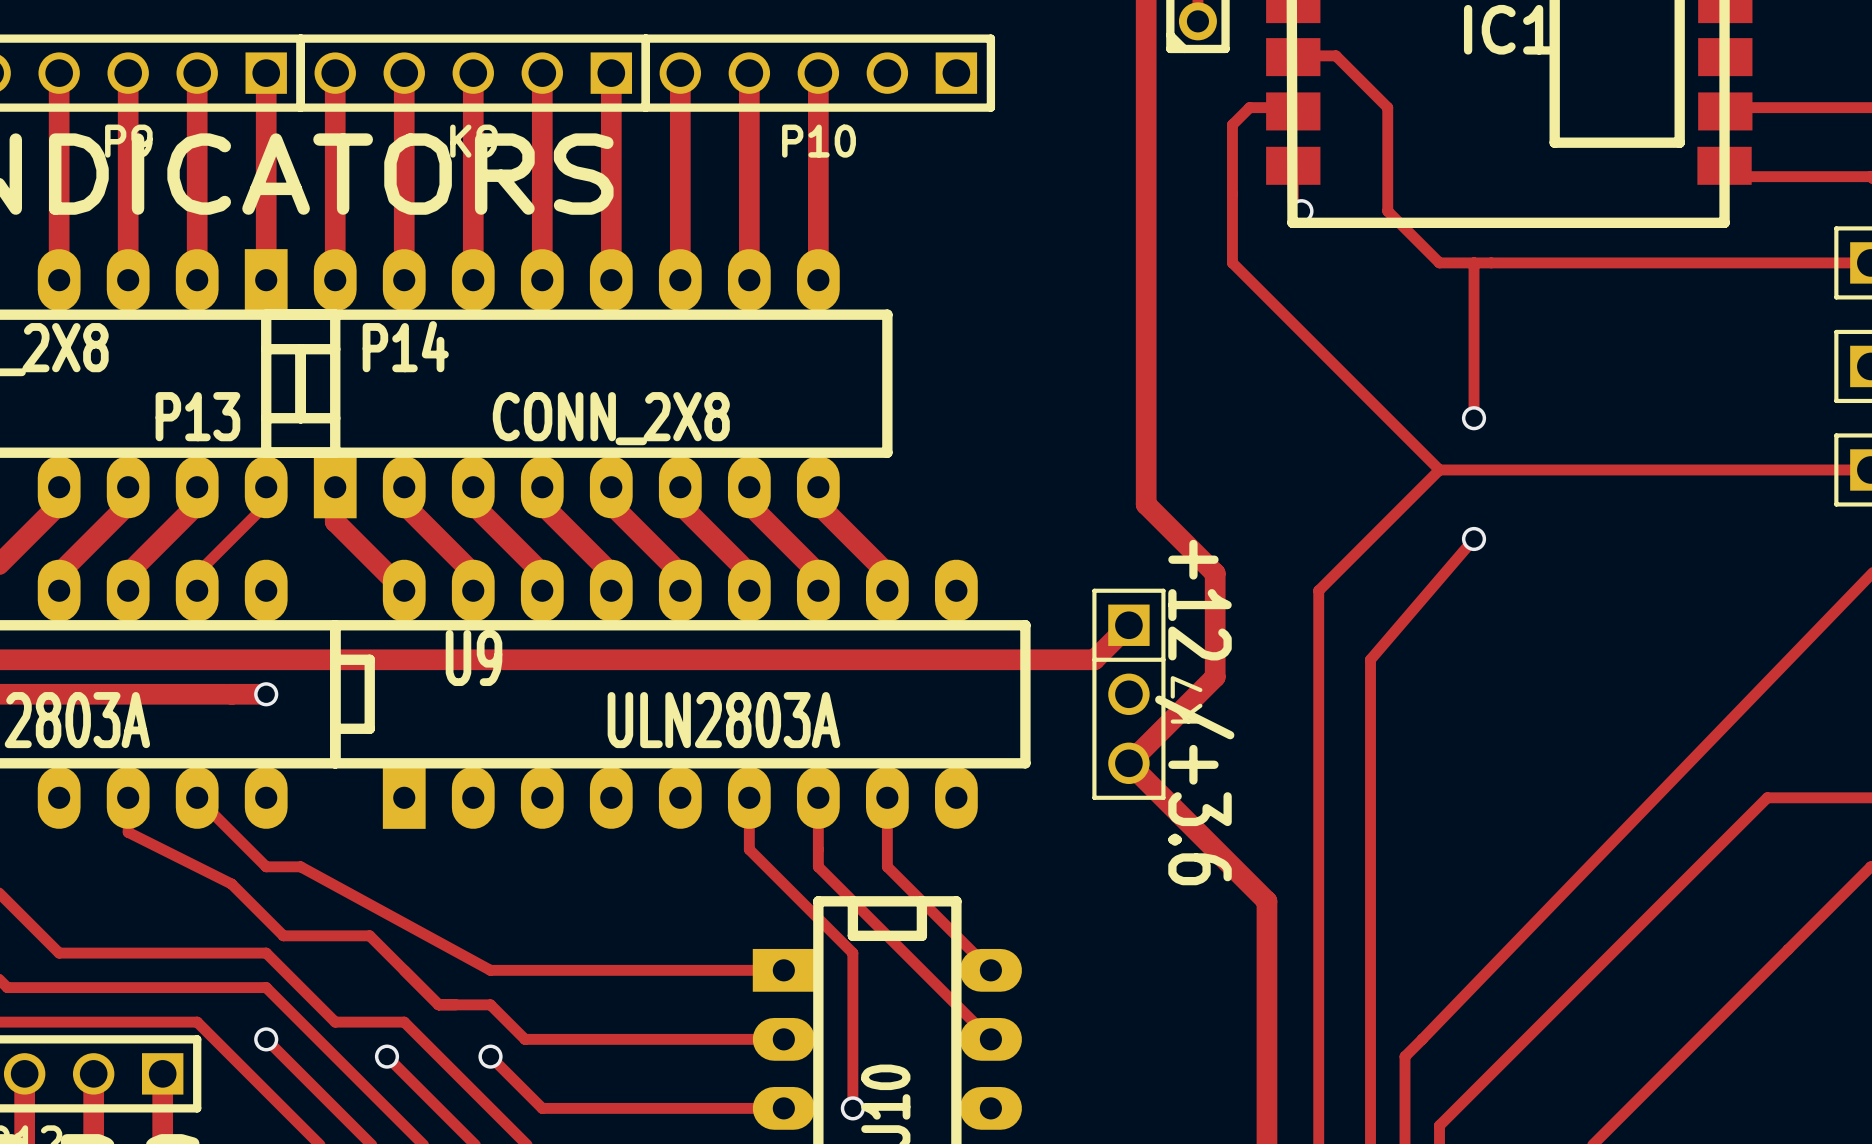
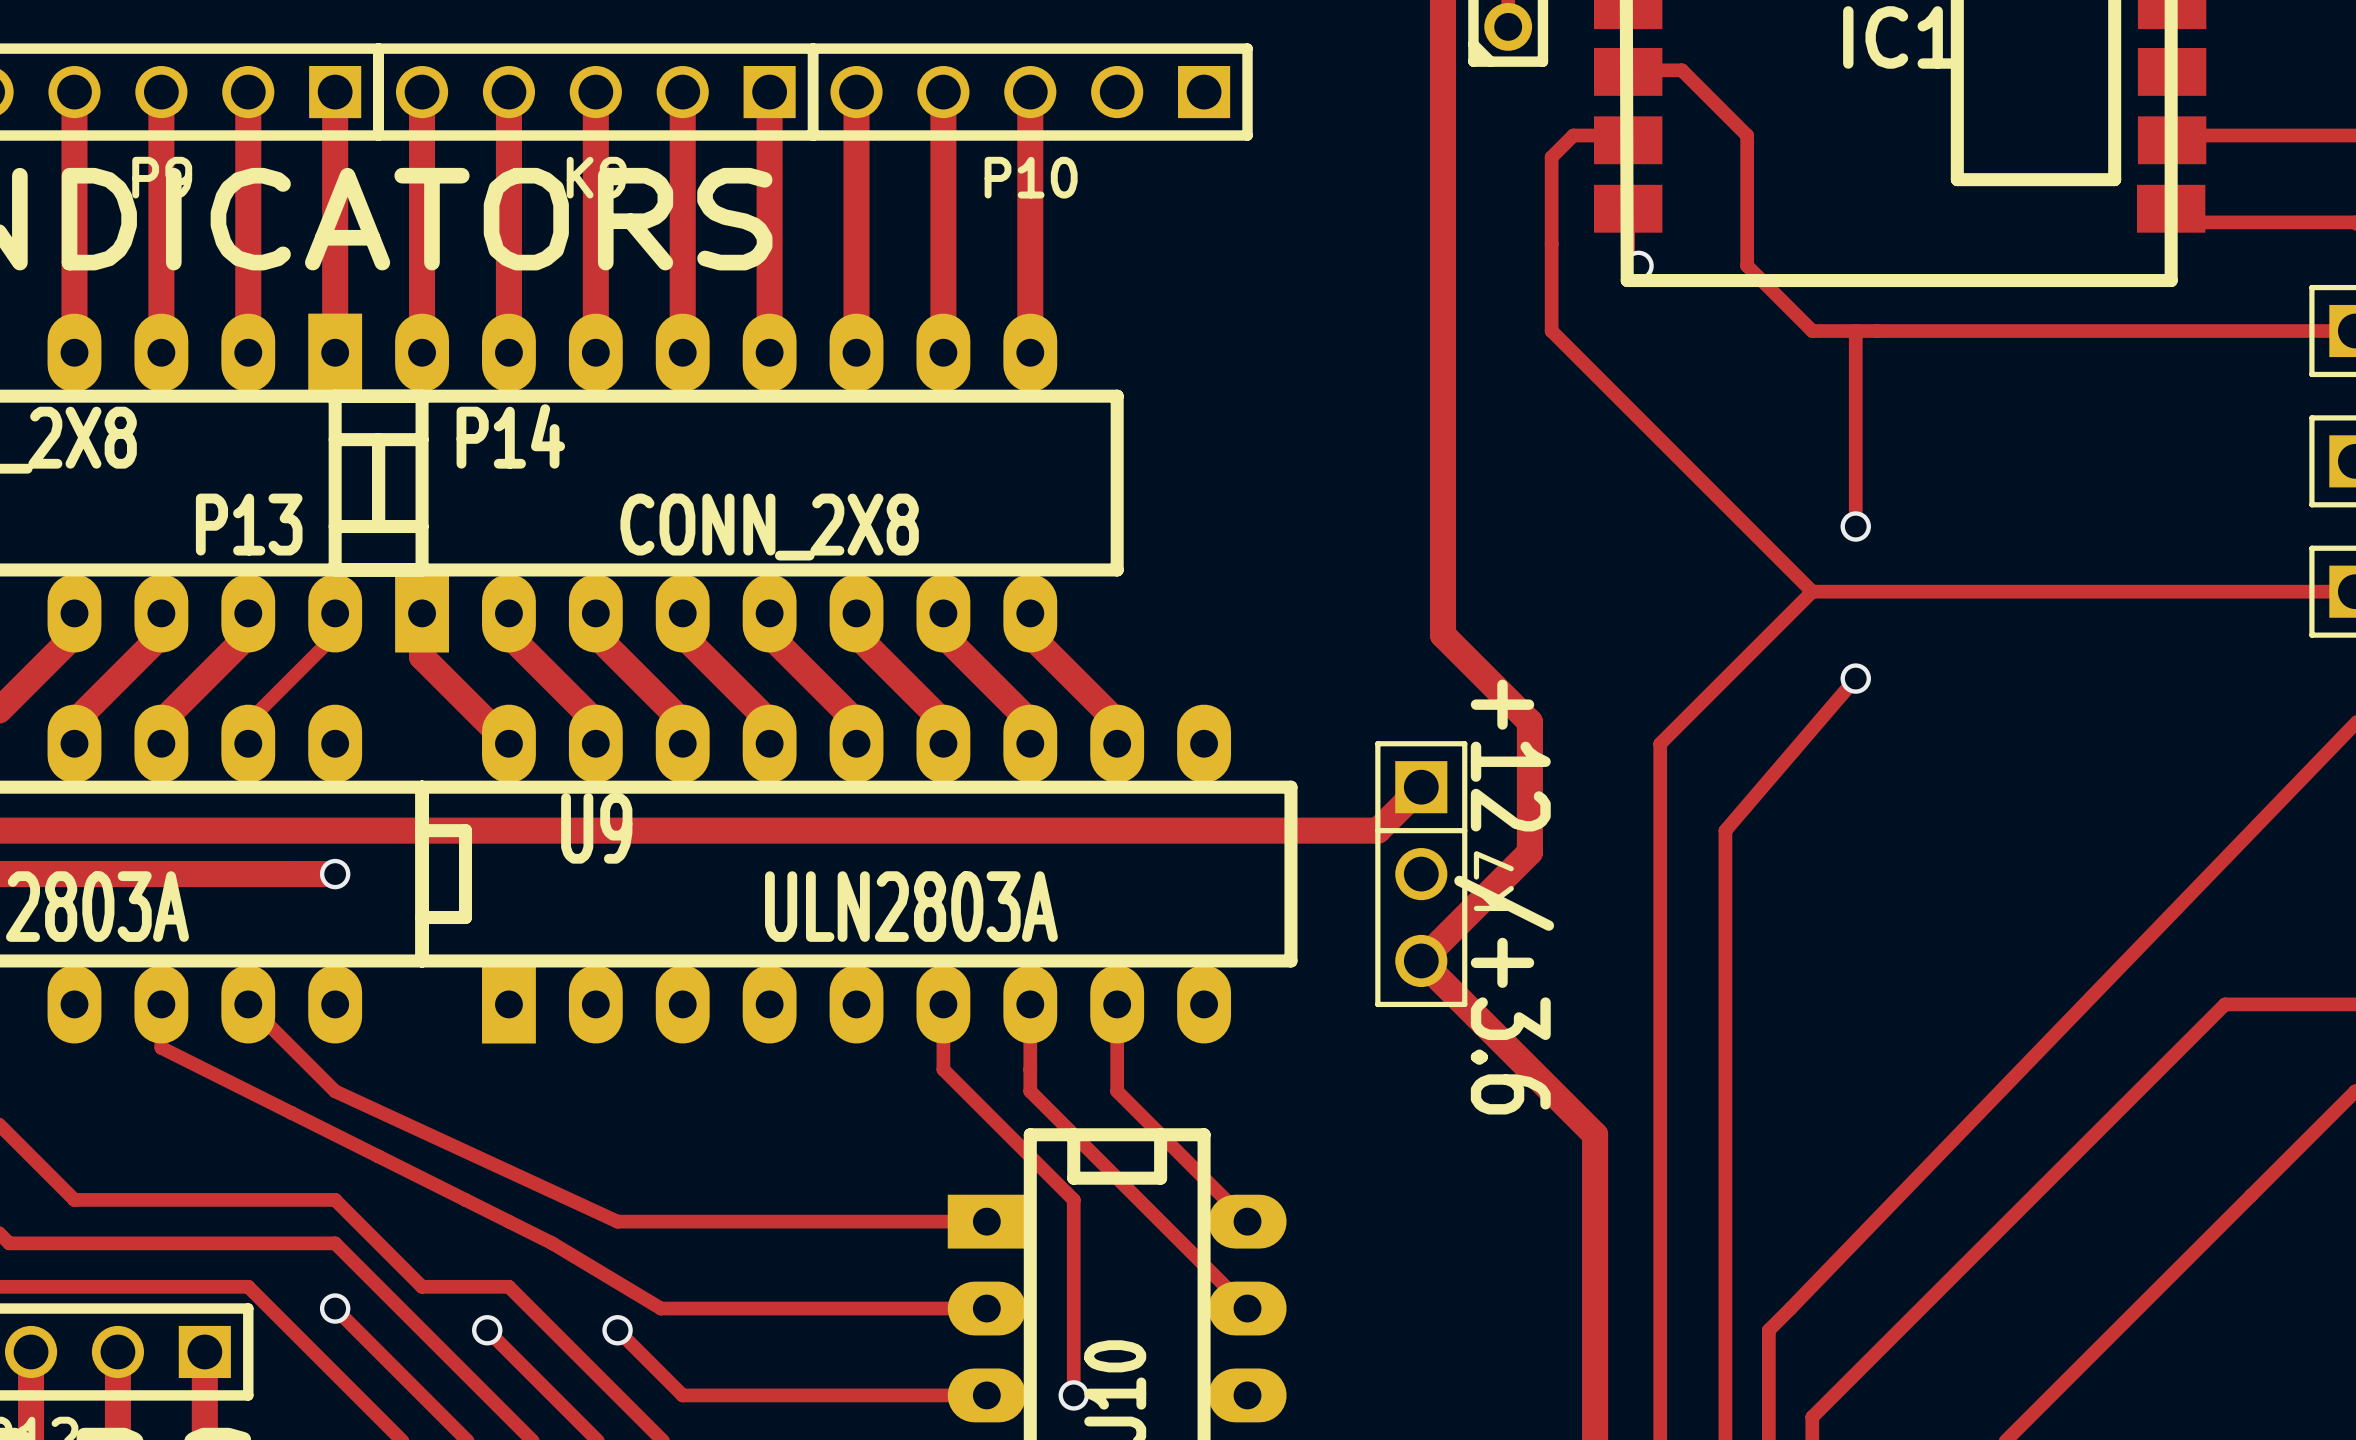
track: (266, 866) (300, 866) (490, 970) -> (335, 1091) (617, 1221)
track: (231, 884) (283, 935) (369, 935) (438, 1004) (490, 1004) (525, 1039) -> (291, 1113) (552, 1243) (661, 1308)

